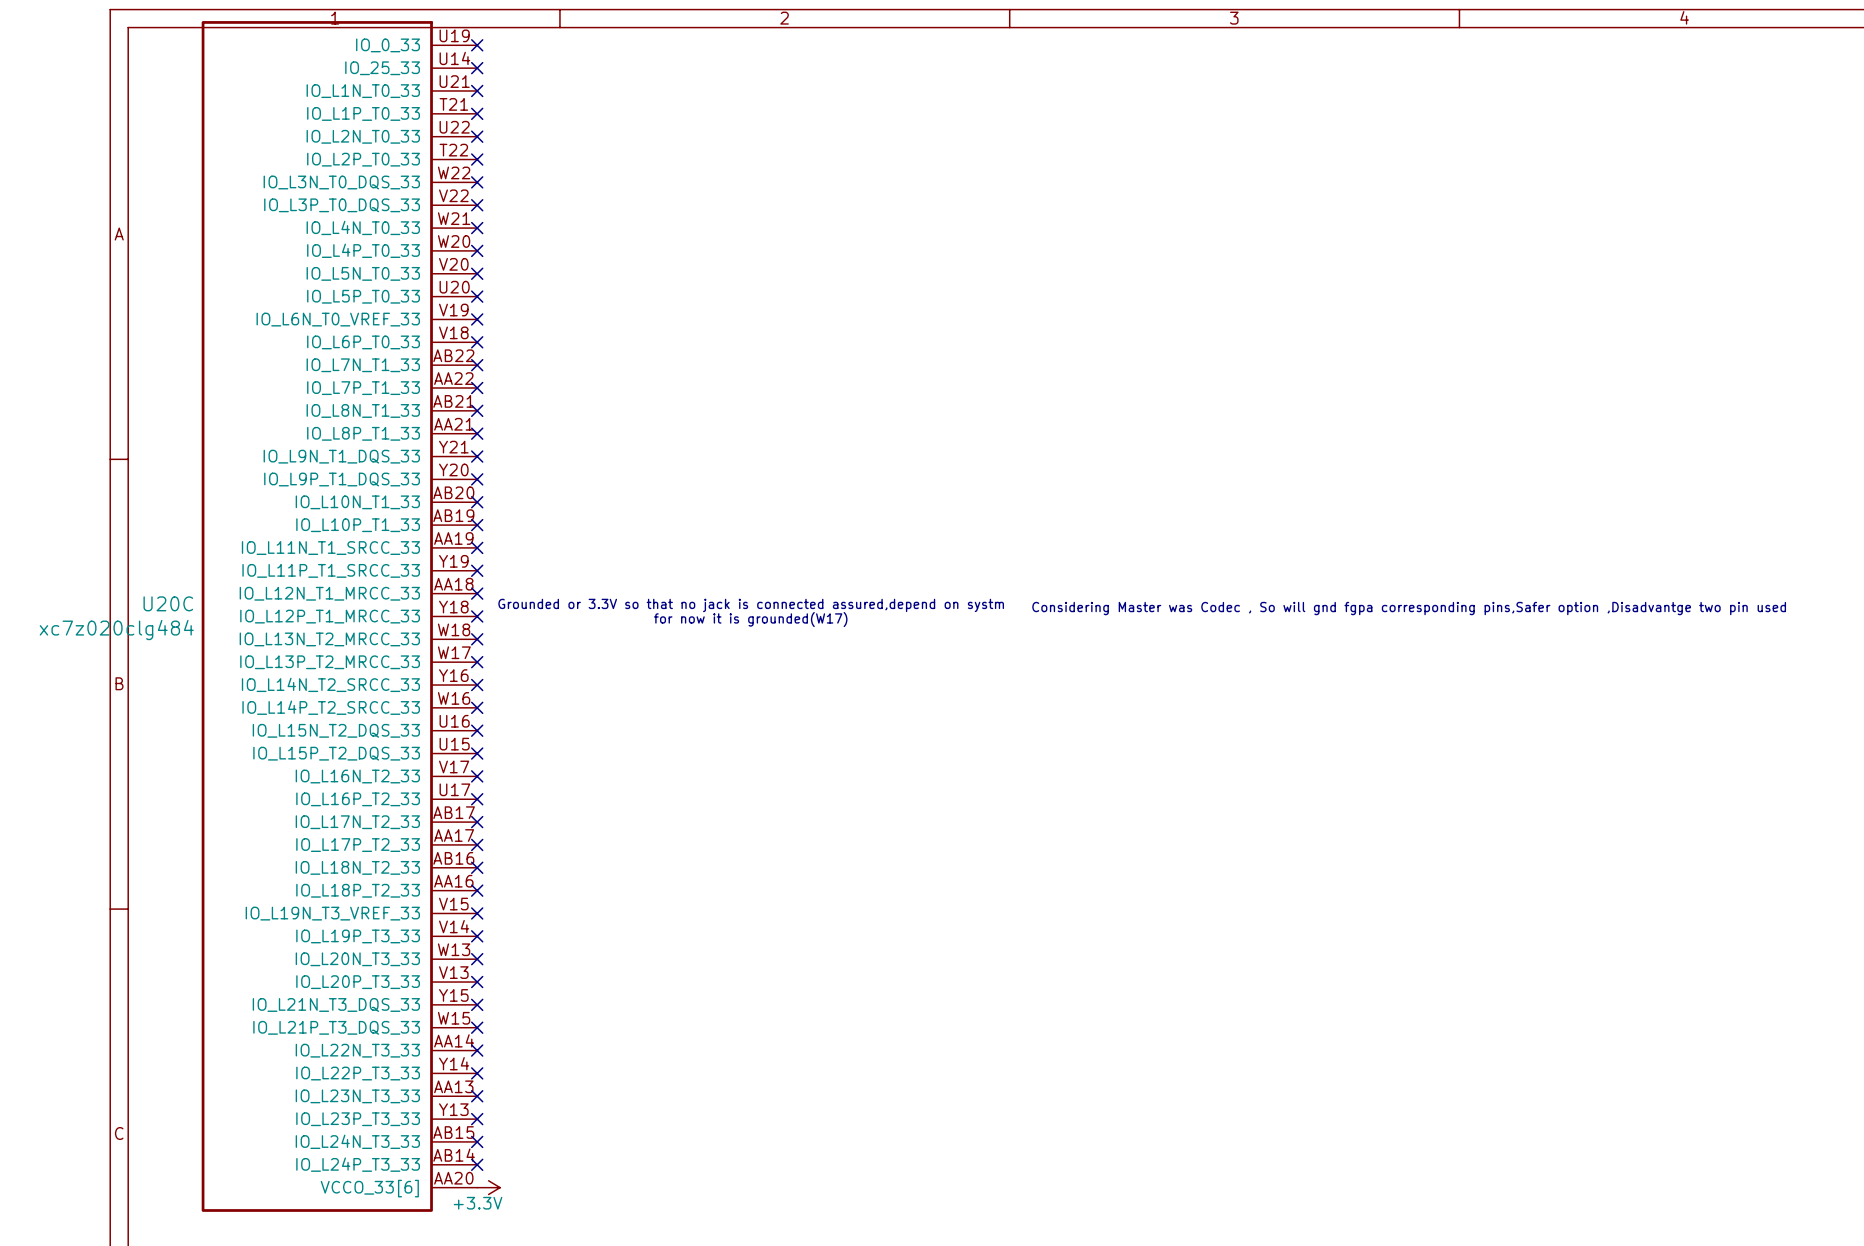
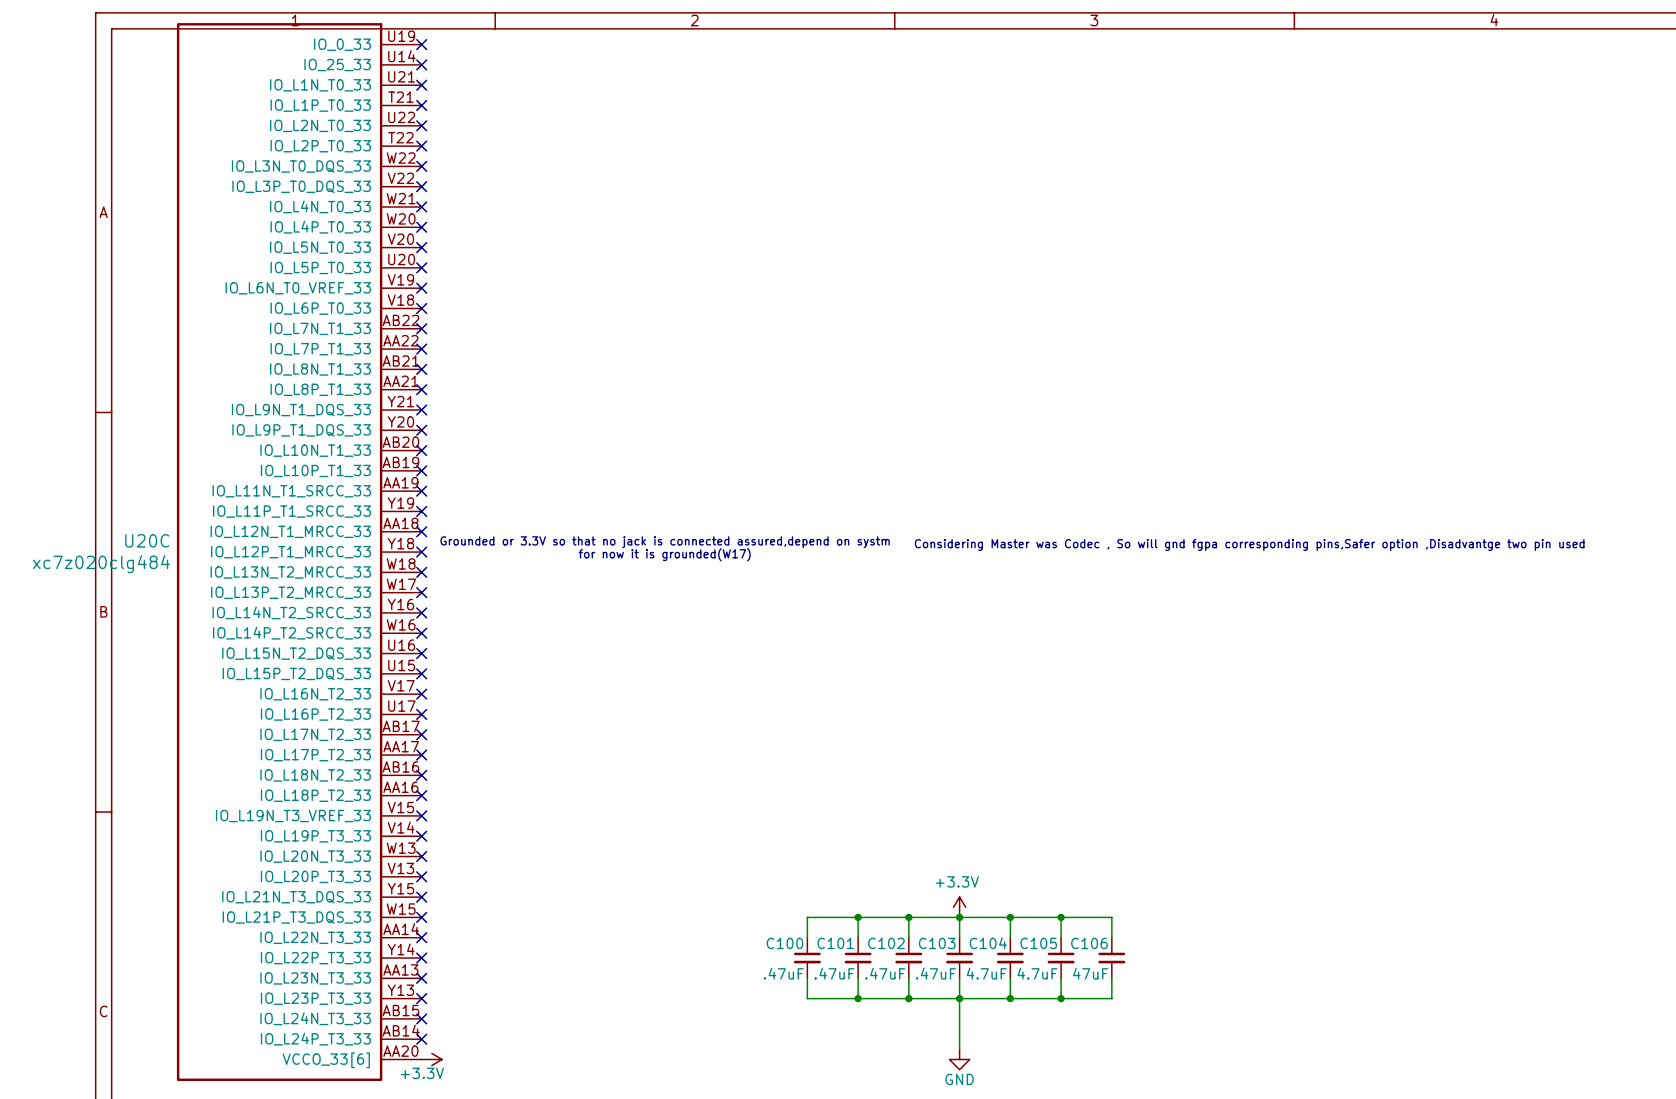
power symbol: none -> +3.3V (959, 907)
wire: none -> (858, 917) (858, 937)
junction: none -> (858, 917)
wire: none -> (908, 917) (908, 937)
junction: none -> (908, 917)
wire: none -> (959, 917) (959, 937)
junction: none -> (959, 917)
wire: none -> (1010, 917) (1010, 937)
junction: none -> (1010, 917)
wire: none -> (1061, 917) (1061, 937)
junction: none -> (1061, 917)
wire: none -> (807, 937) (807, 917) (1111, 917) (1111, 937)
C100: none -> .47uF (807, 958)
C101: none -> .47uF (858, 958)
C102: none -> .47uF (908, 958)
C103: none -> .47uF (959, 958)
C104: none -> 4.7uF (1010, 958)
C105: none -> 4.7uF (1061, 958)
C106: none -> 47uF (1111, 958)
wire: none -> (807, 978) (807, 998) (1111, 998) (1111, 978)
wire: none -> (858, 978) (858, 998)
wire: none -> (908, 978) (908, 998)
wire: none -> (959, 978) (959, 1049)
wire: none -> (1010, 978) (1010, 998)
wire: none -> (1061, 978) (1061, 998)
junction: none -> (858, 998)
junction: none -> (908, 998)
junction: none -> (959, 998)
junction: none -> (1010, 998)
junction: none -> (1061, 998)
power symbol: none -> GND (959, 1059)

